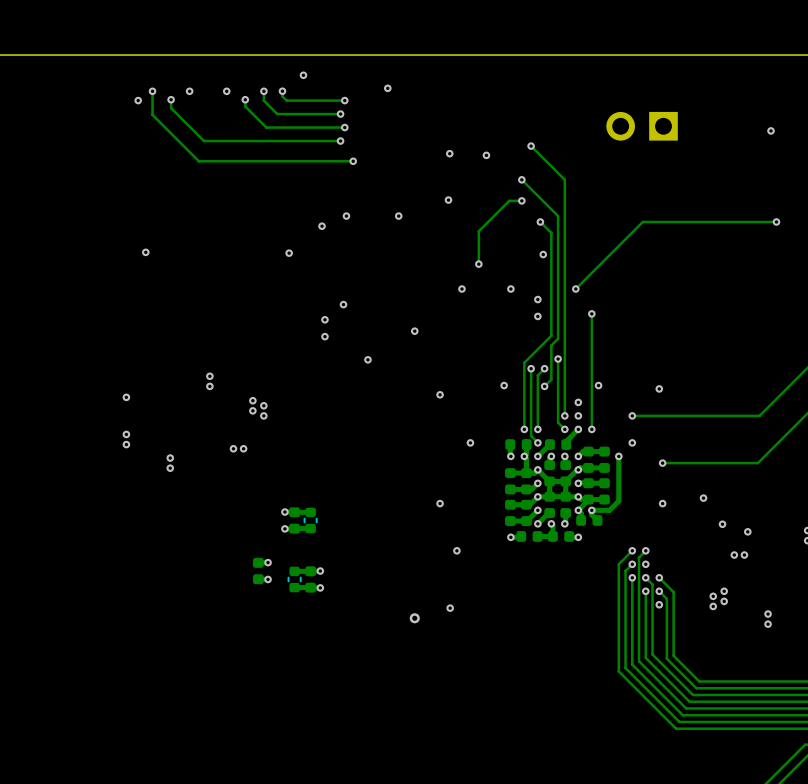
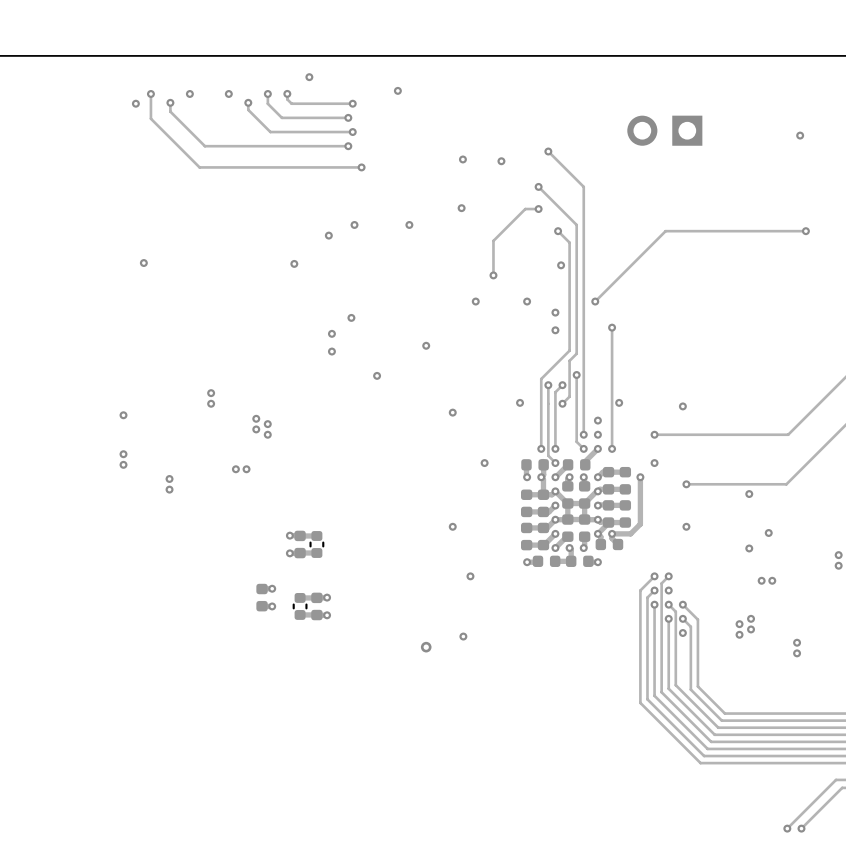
via: none -> (749, 494)
via: (703, 498) -> none
via: none -> (768, 532)
via: (747, 531) -> none

